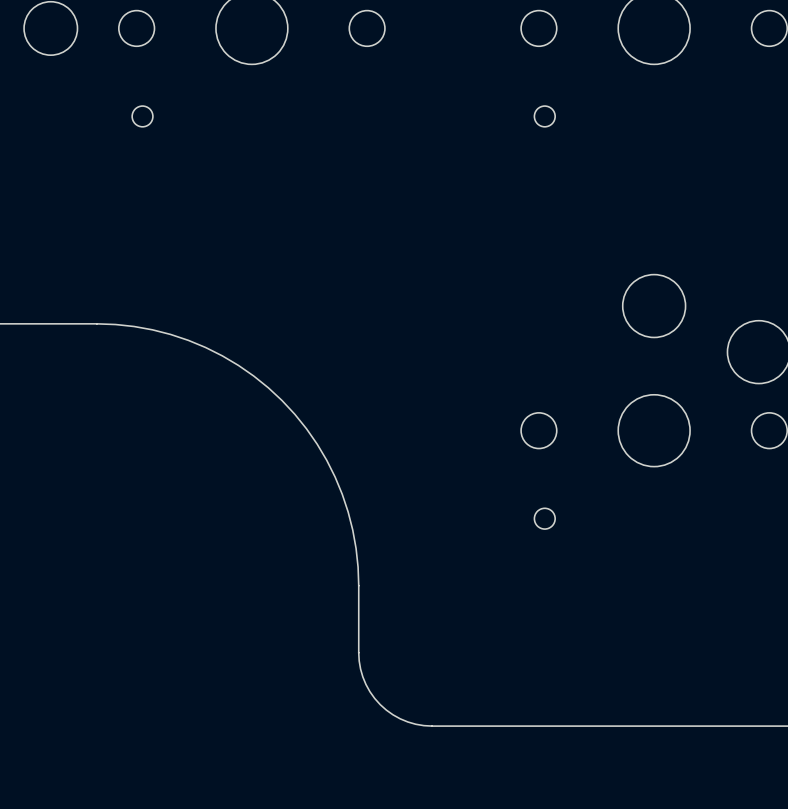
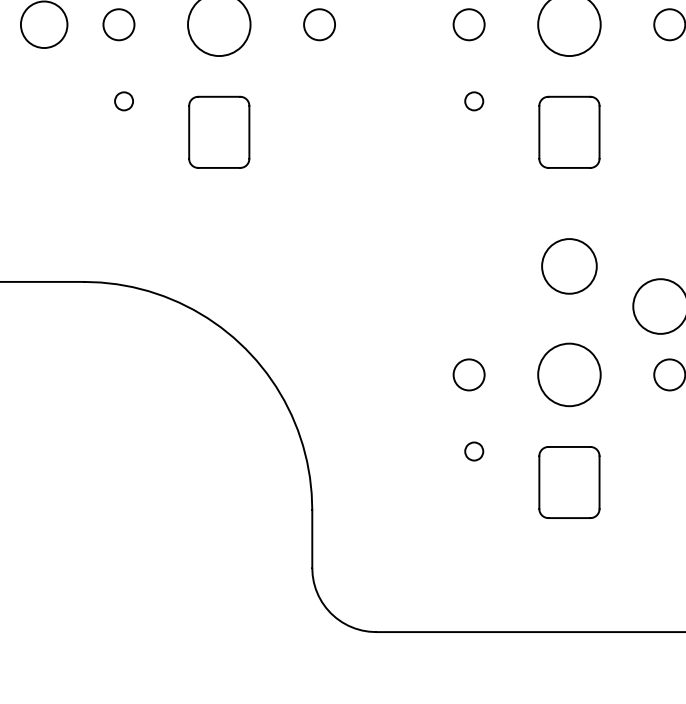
part: none -> (219, 132)
part: none -> (569, 132)
part: none -> (569, 482)

